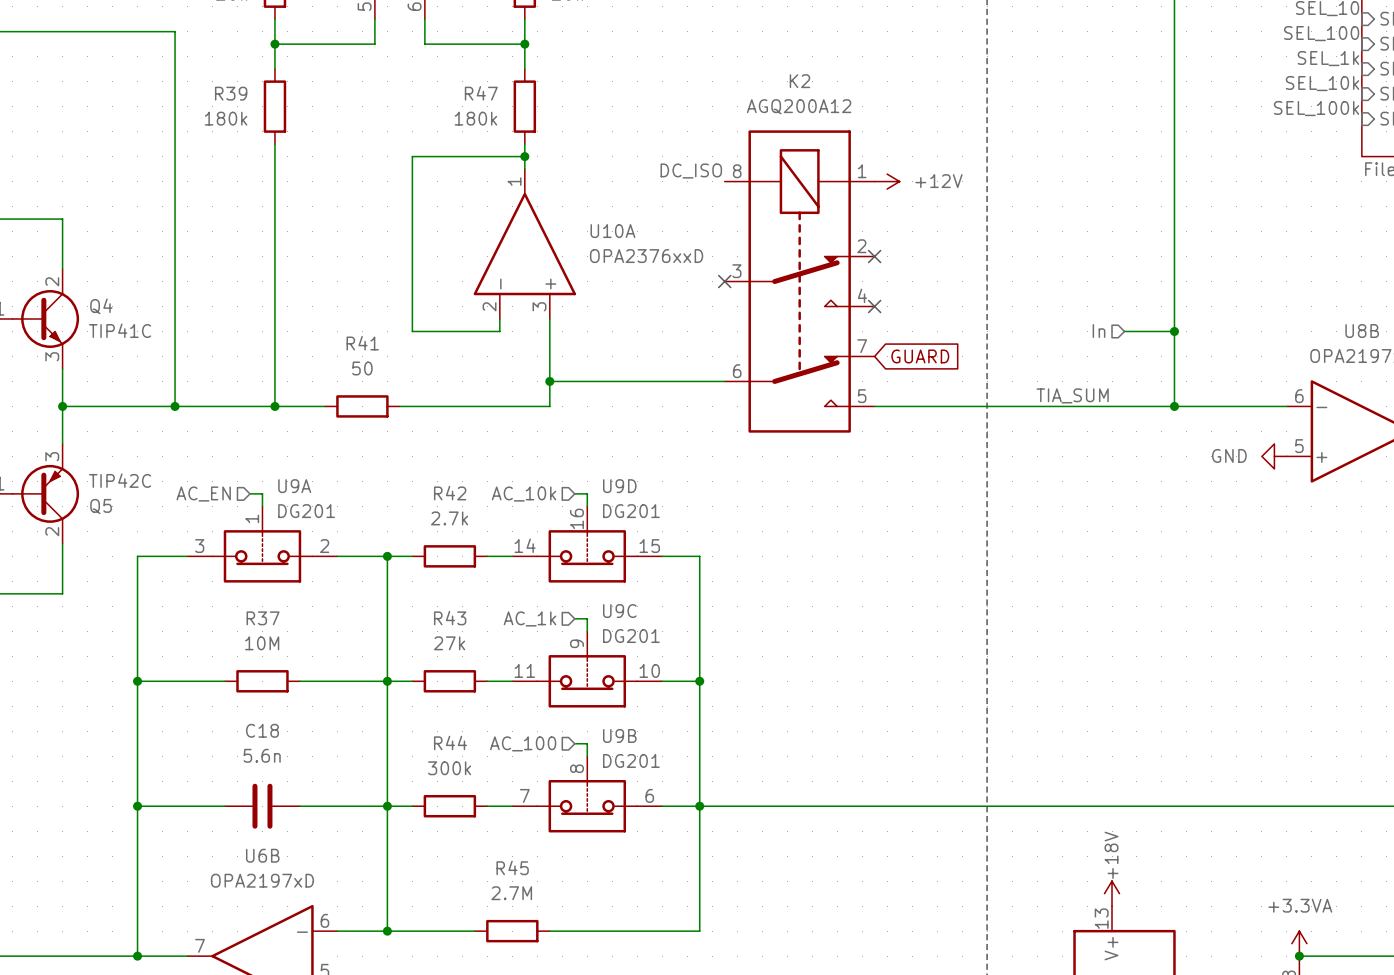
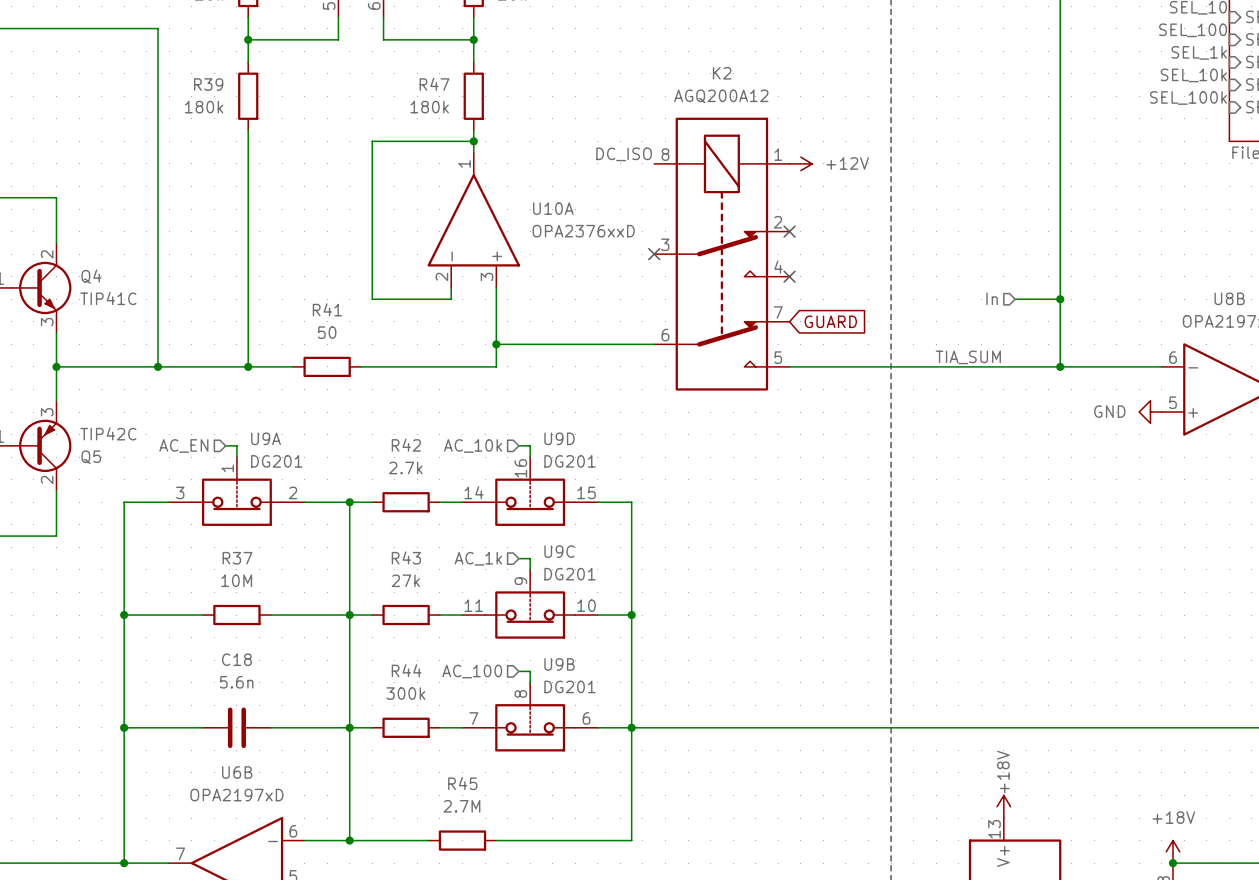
power symbol: +3.3VA (1299, 943) -> +18V (1172, 851)

